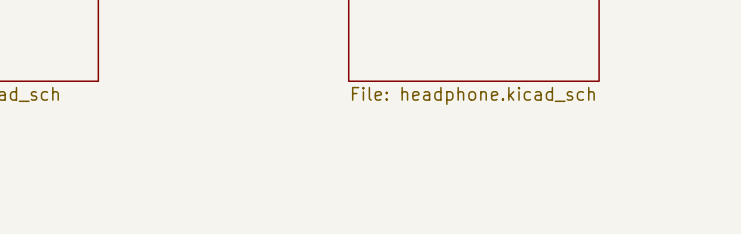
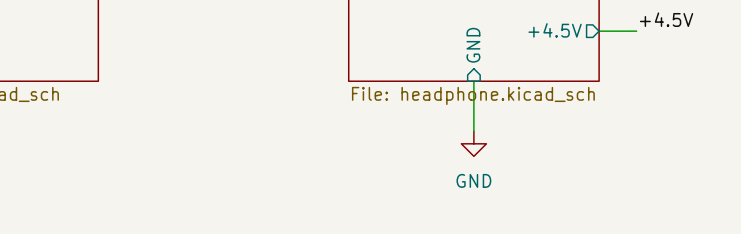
label: none -> +4.5V (666, 19)
sheet pin: none -> +4.5V (555, 30)
wire: none -> (599, 31) (636, 31)
sheet pin: none -> GND (473, 45)
wire: none -> (473, 81) (473, 131)
power symbol: none -> GND (473, 143)

